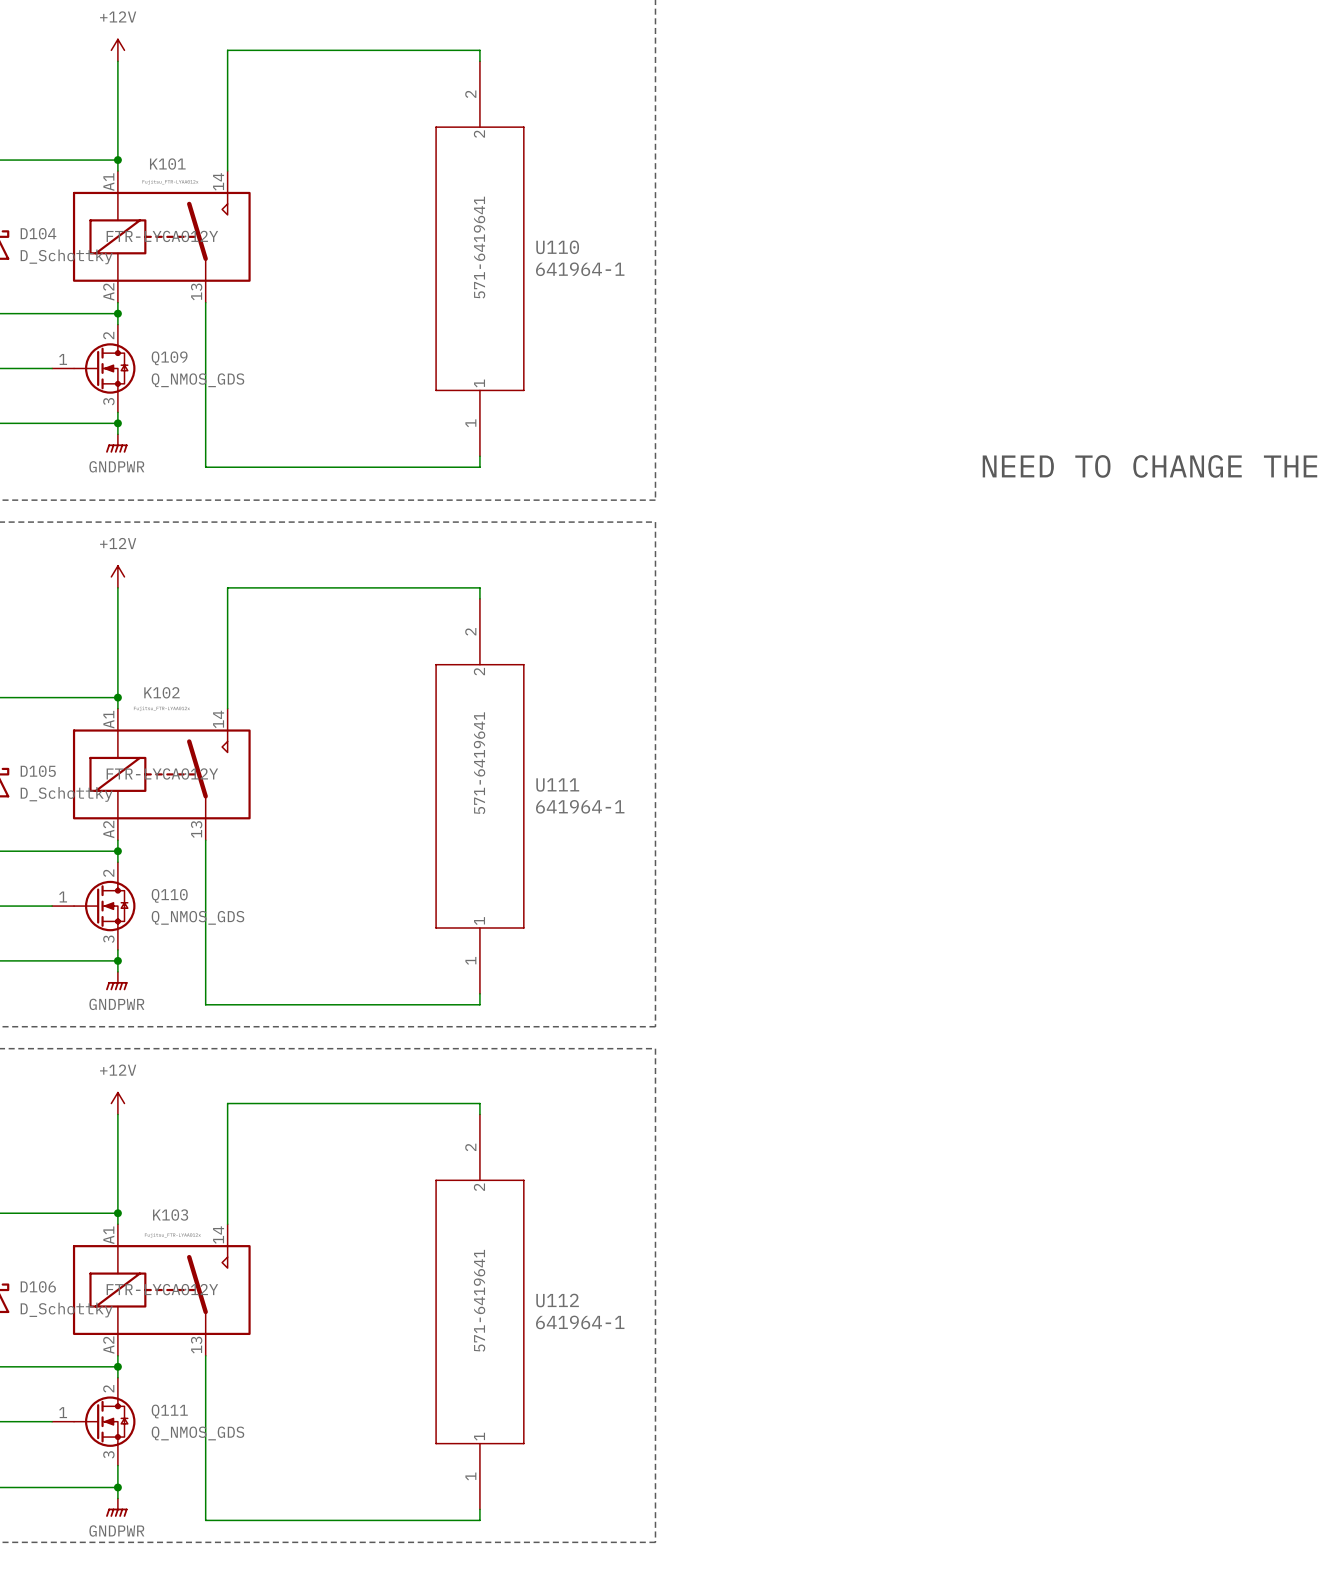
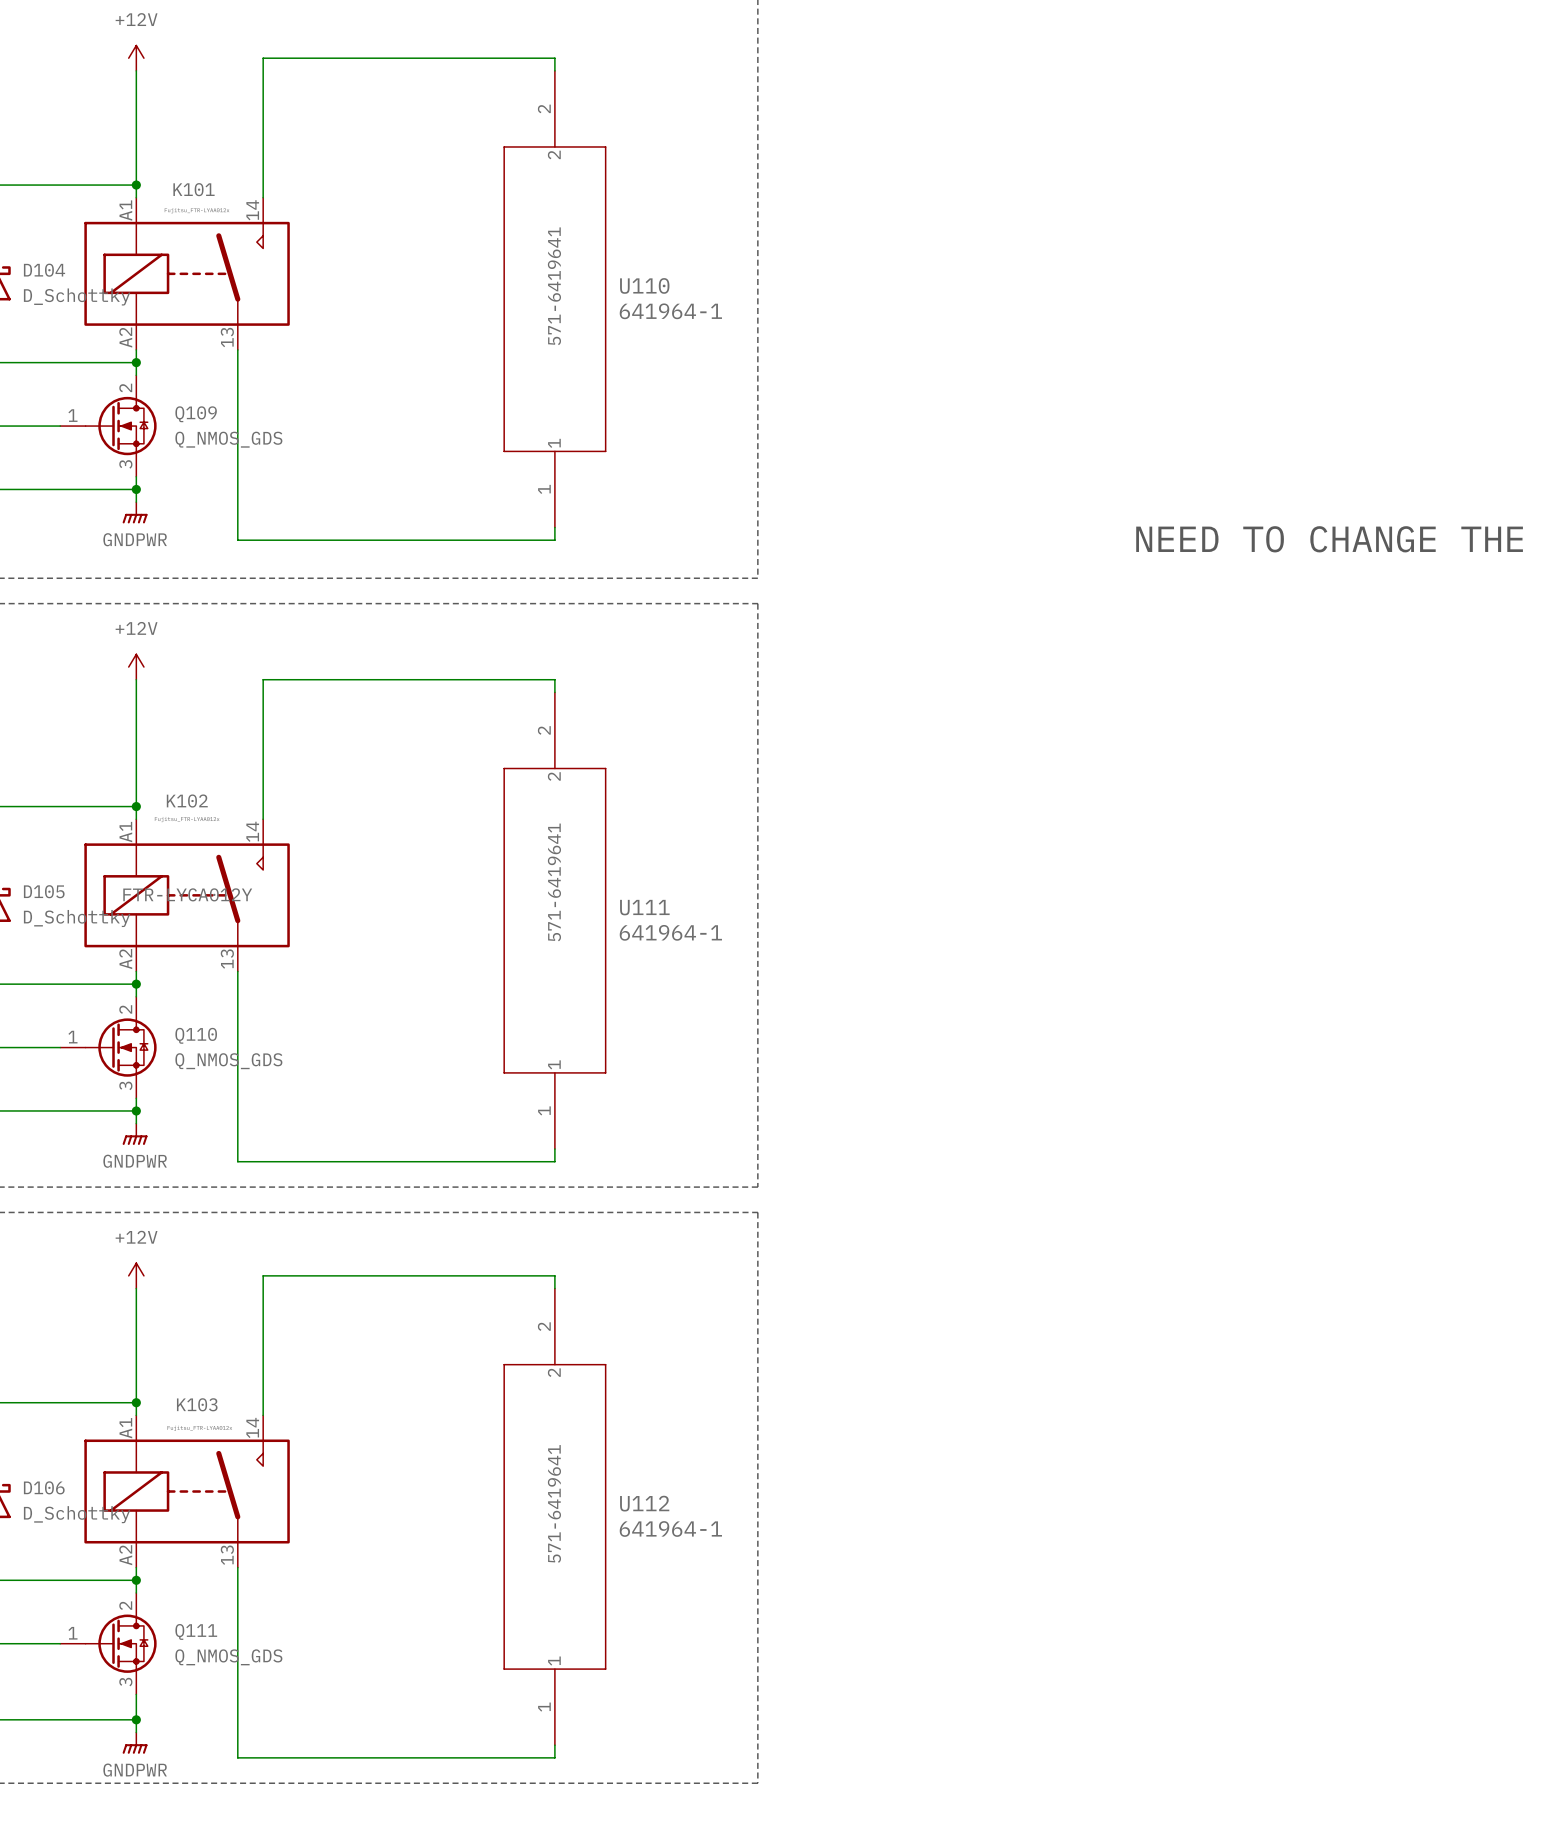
K101 text: FTR-LYCA012Y (162, 236) -> none
K103 text: FTR-LYCA012Y (162, 1289) -> none

